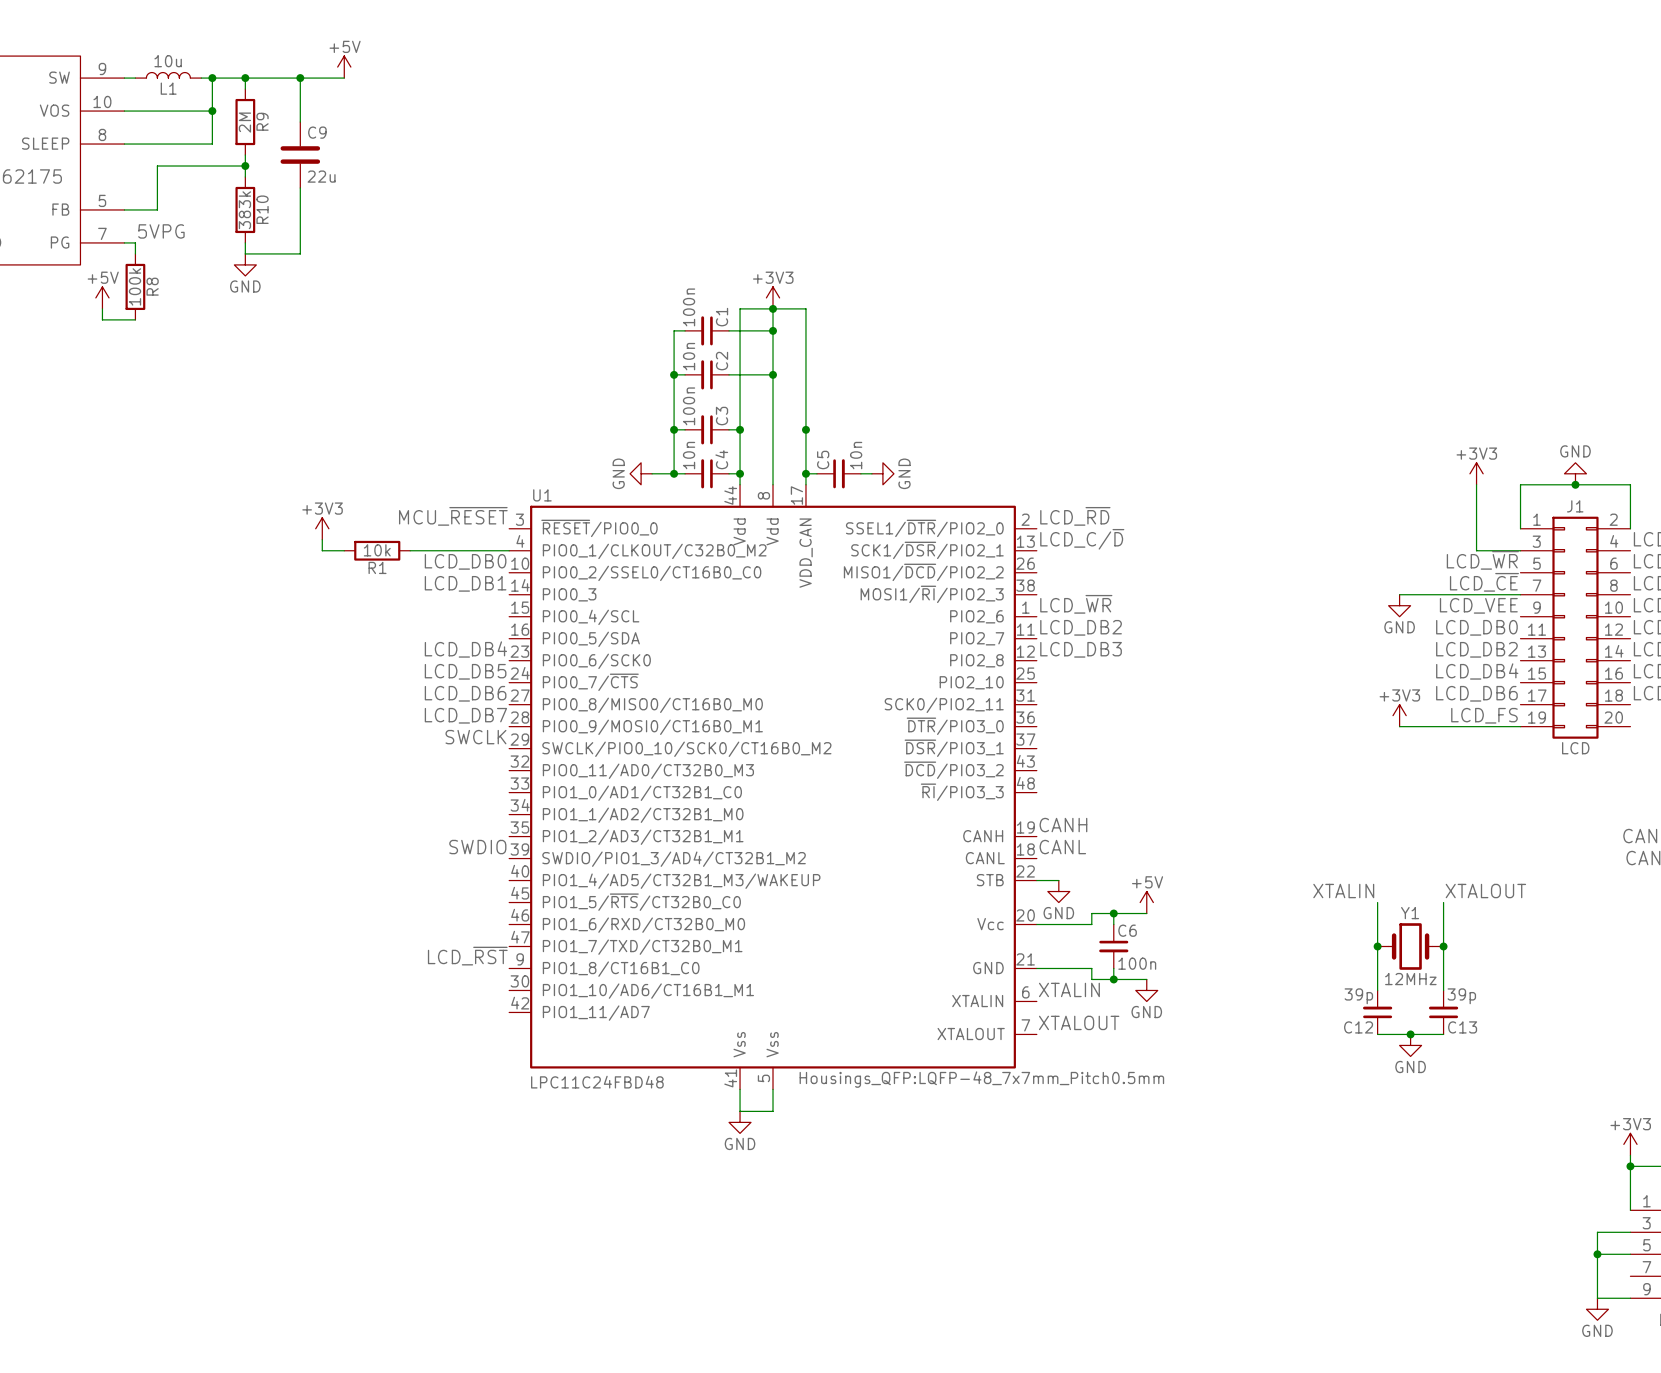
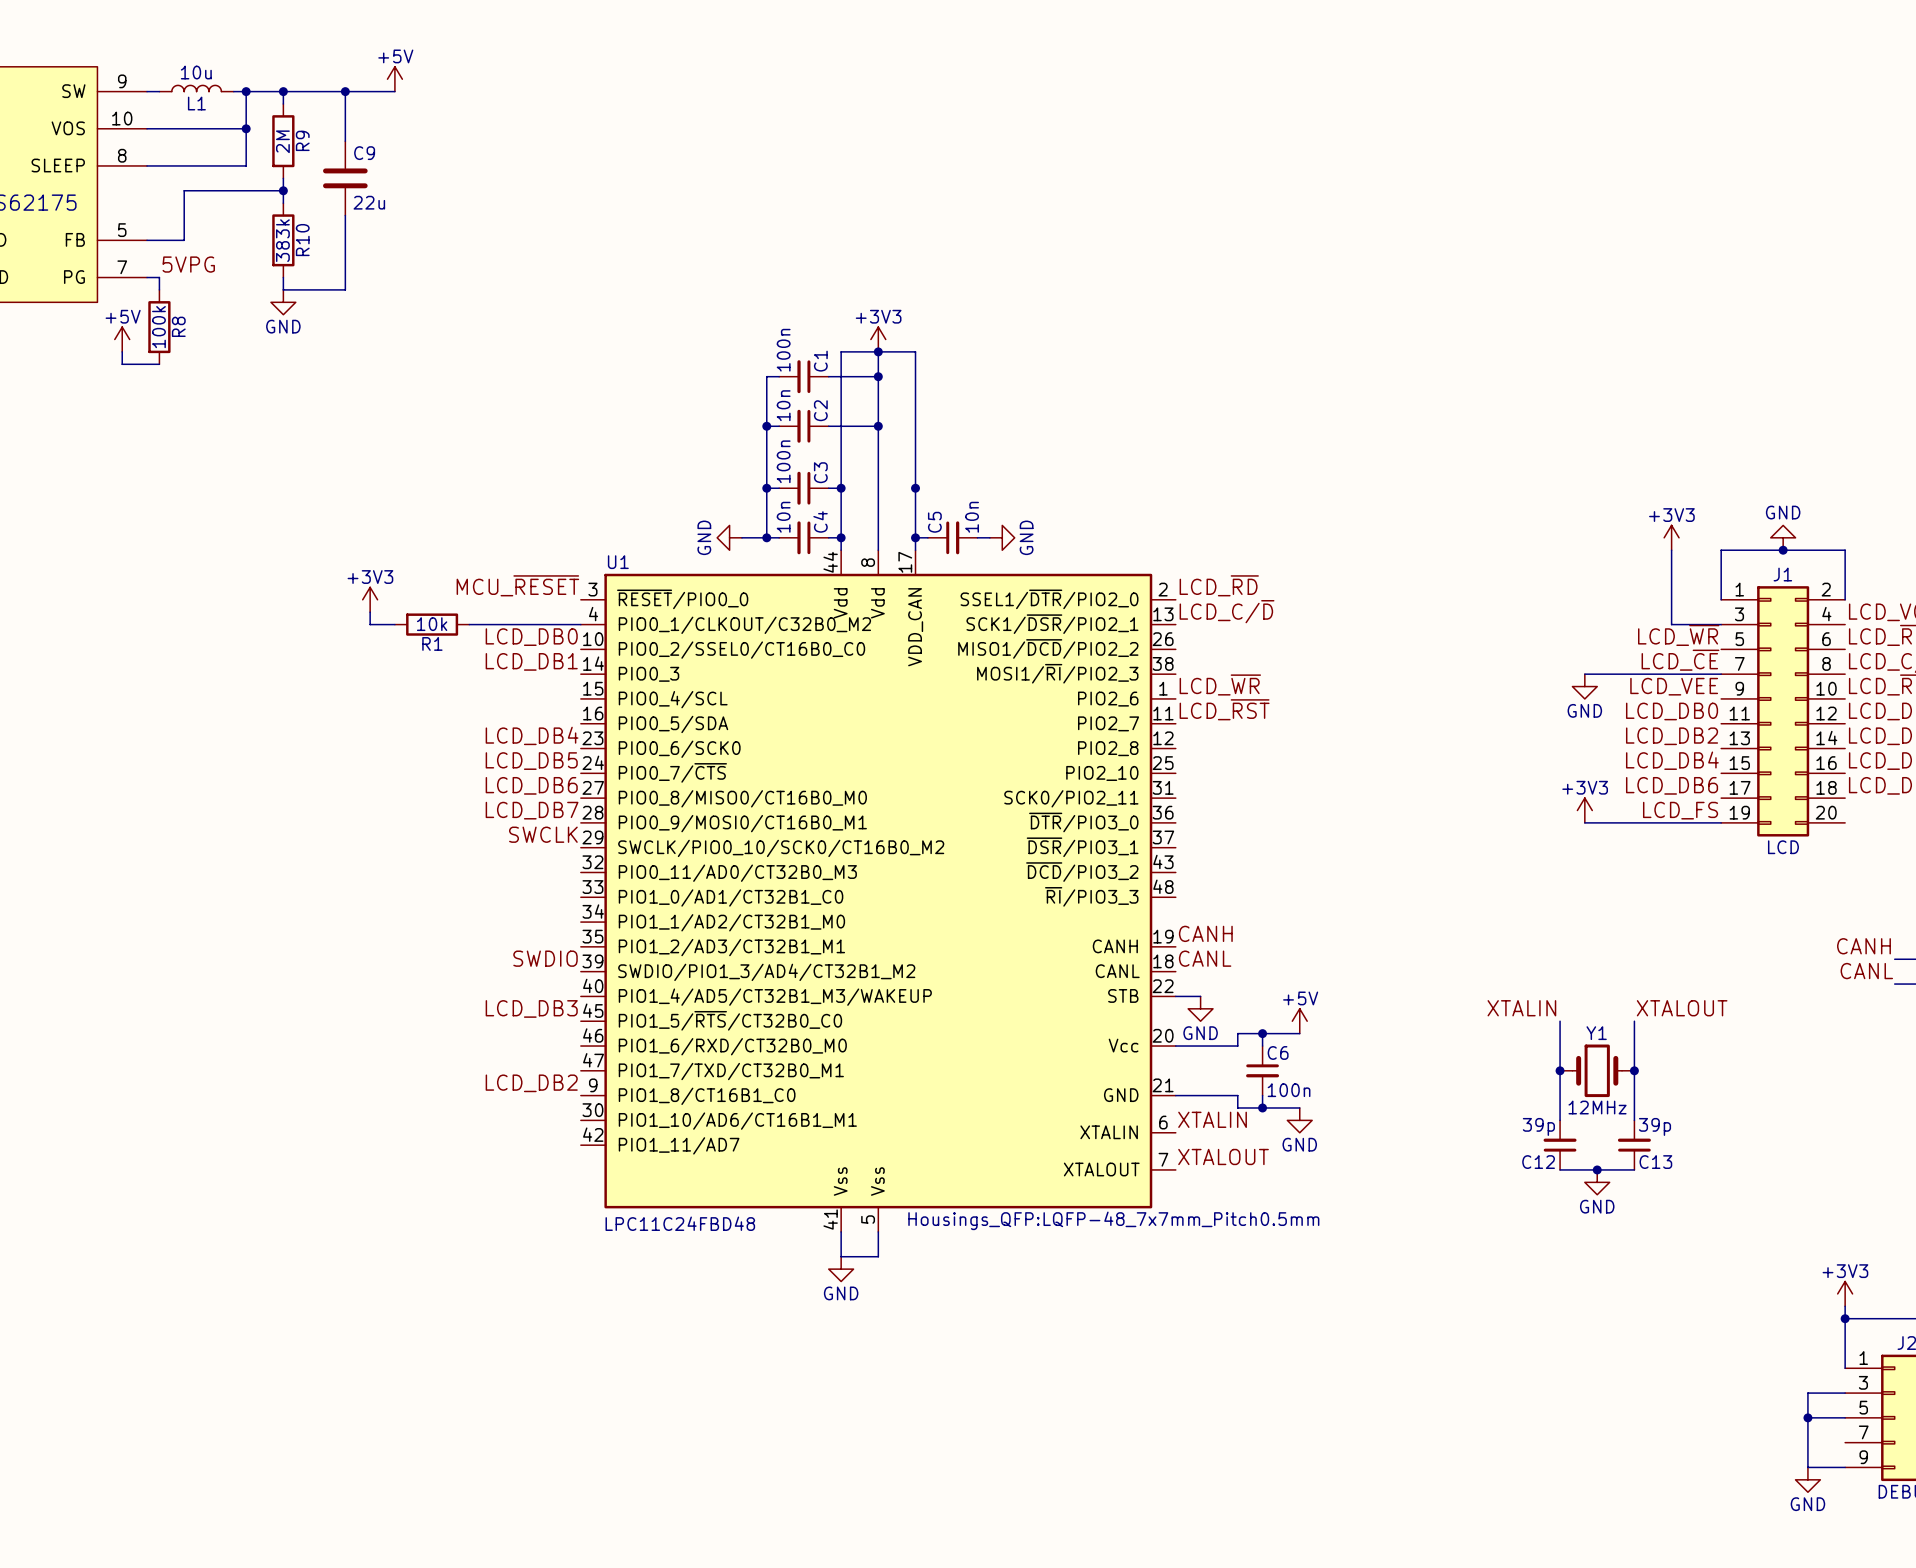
label: LCD_DB2 (1081, 627) -> LCD_~{RST} (1224, 709)
label: LCD_DB3 (1081, 649) -> none
label: none -> LCD_DB3 (531, 1008)
label: LCD_~{RST} (467, 956) -> LCD_DB2 (531, 1083)

